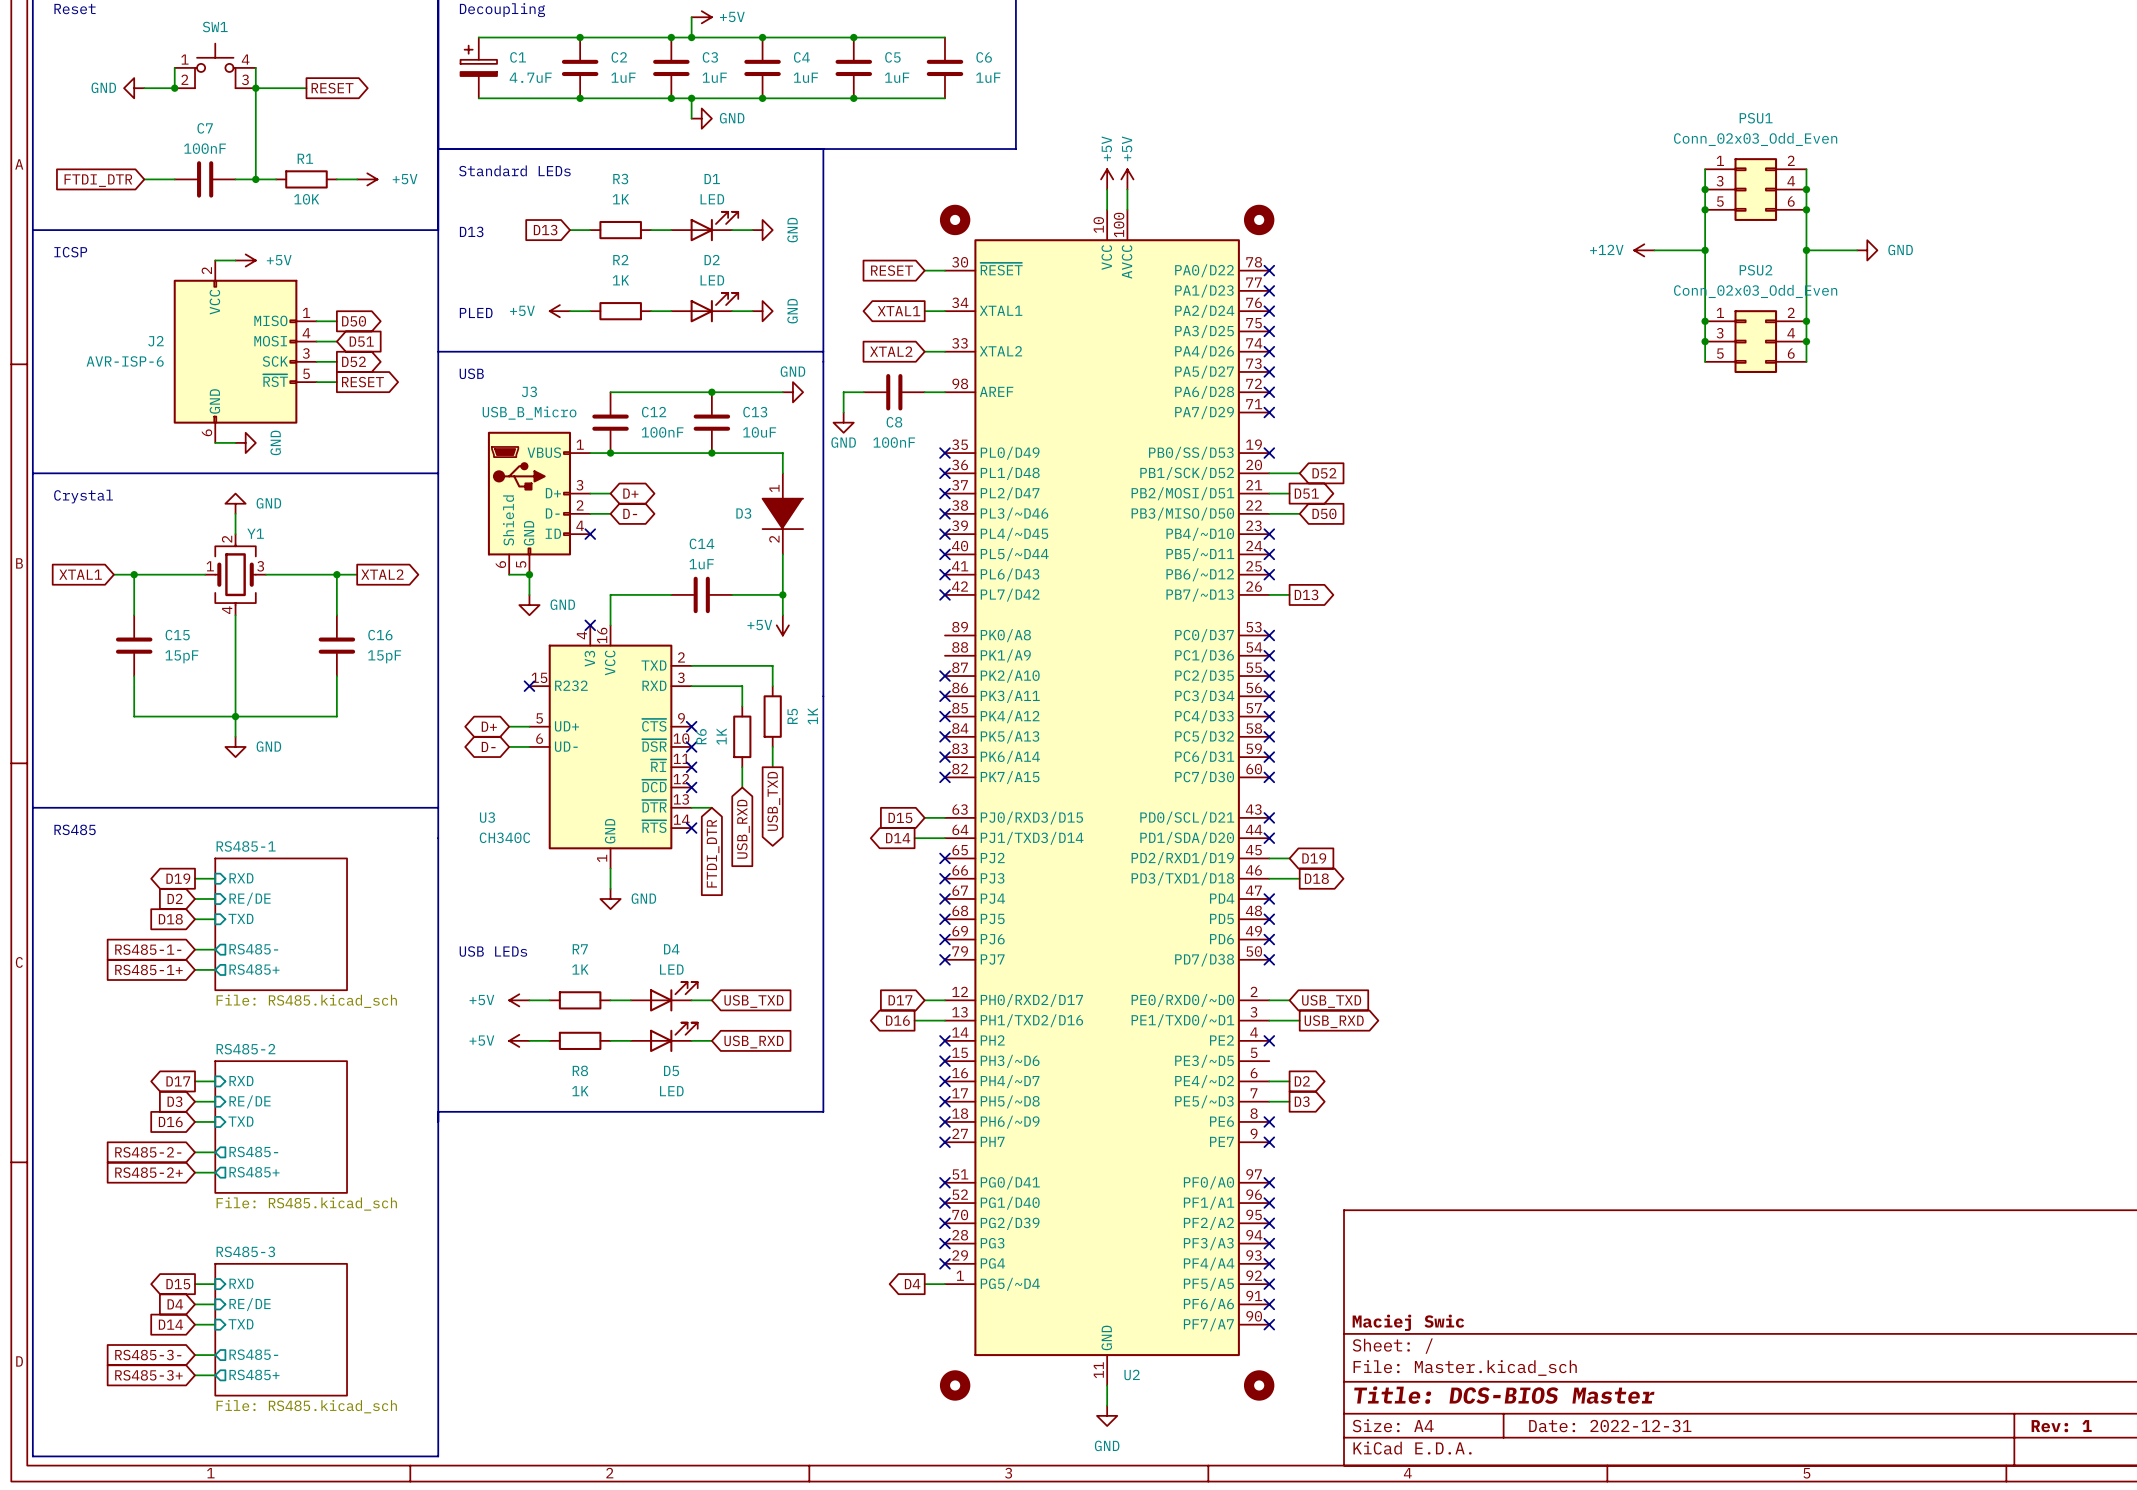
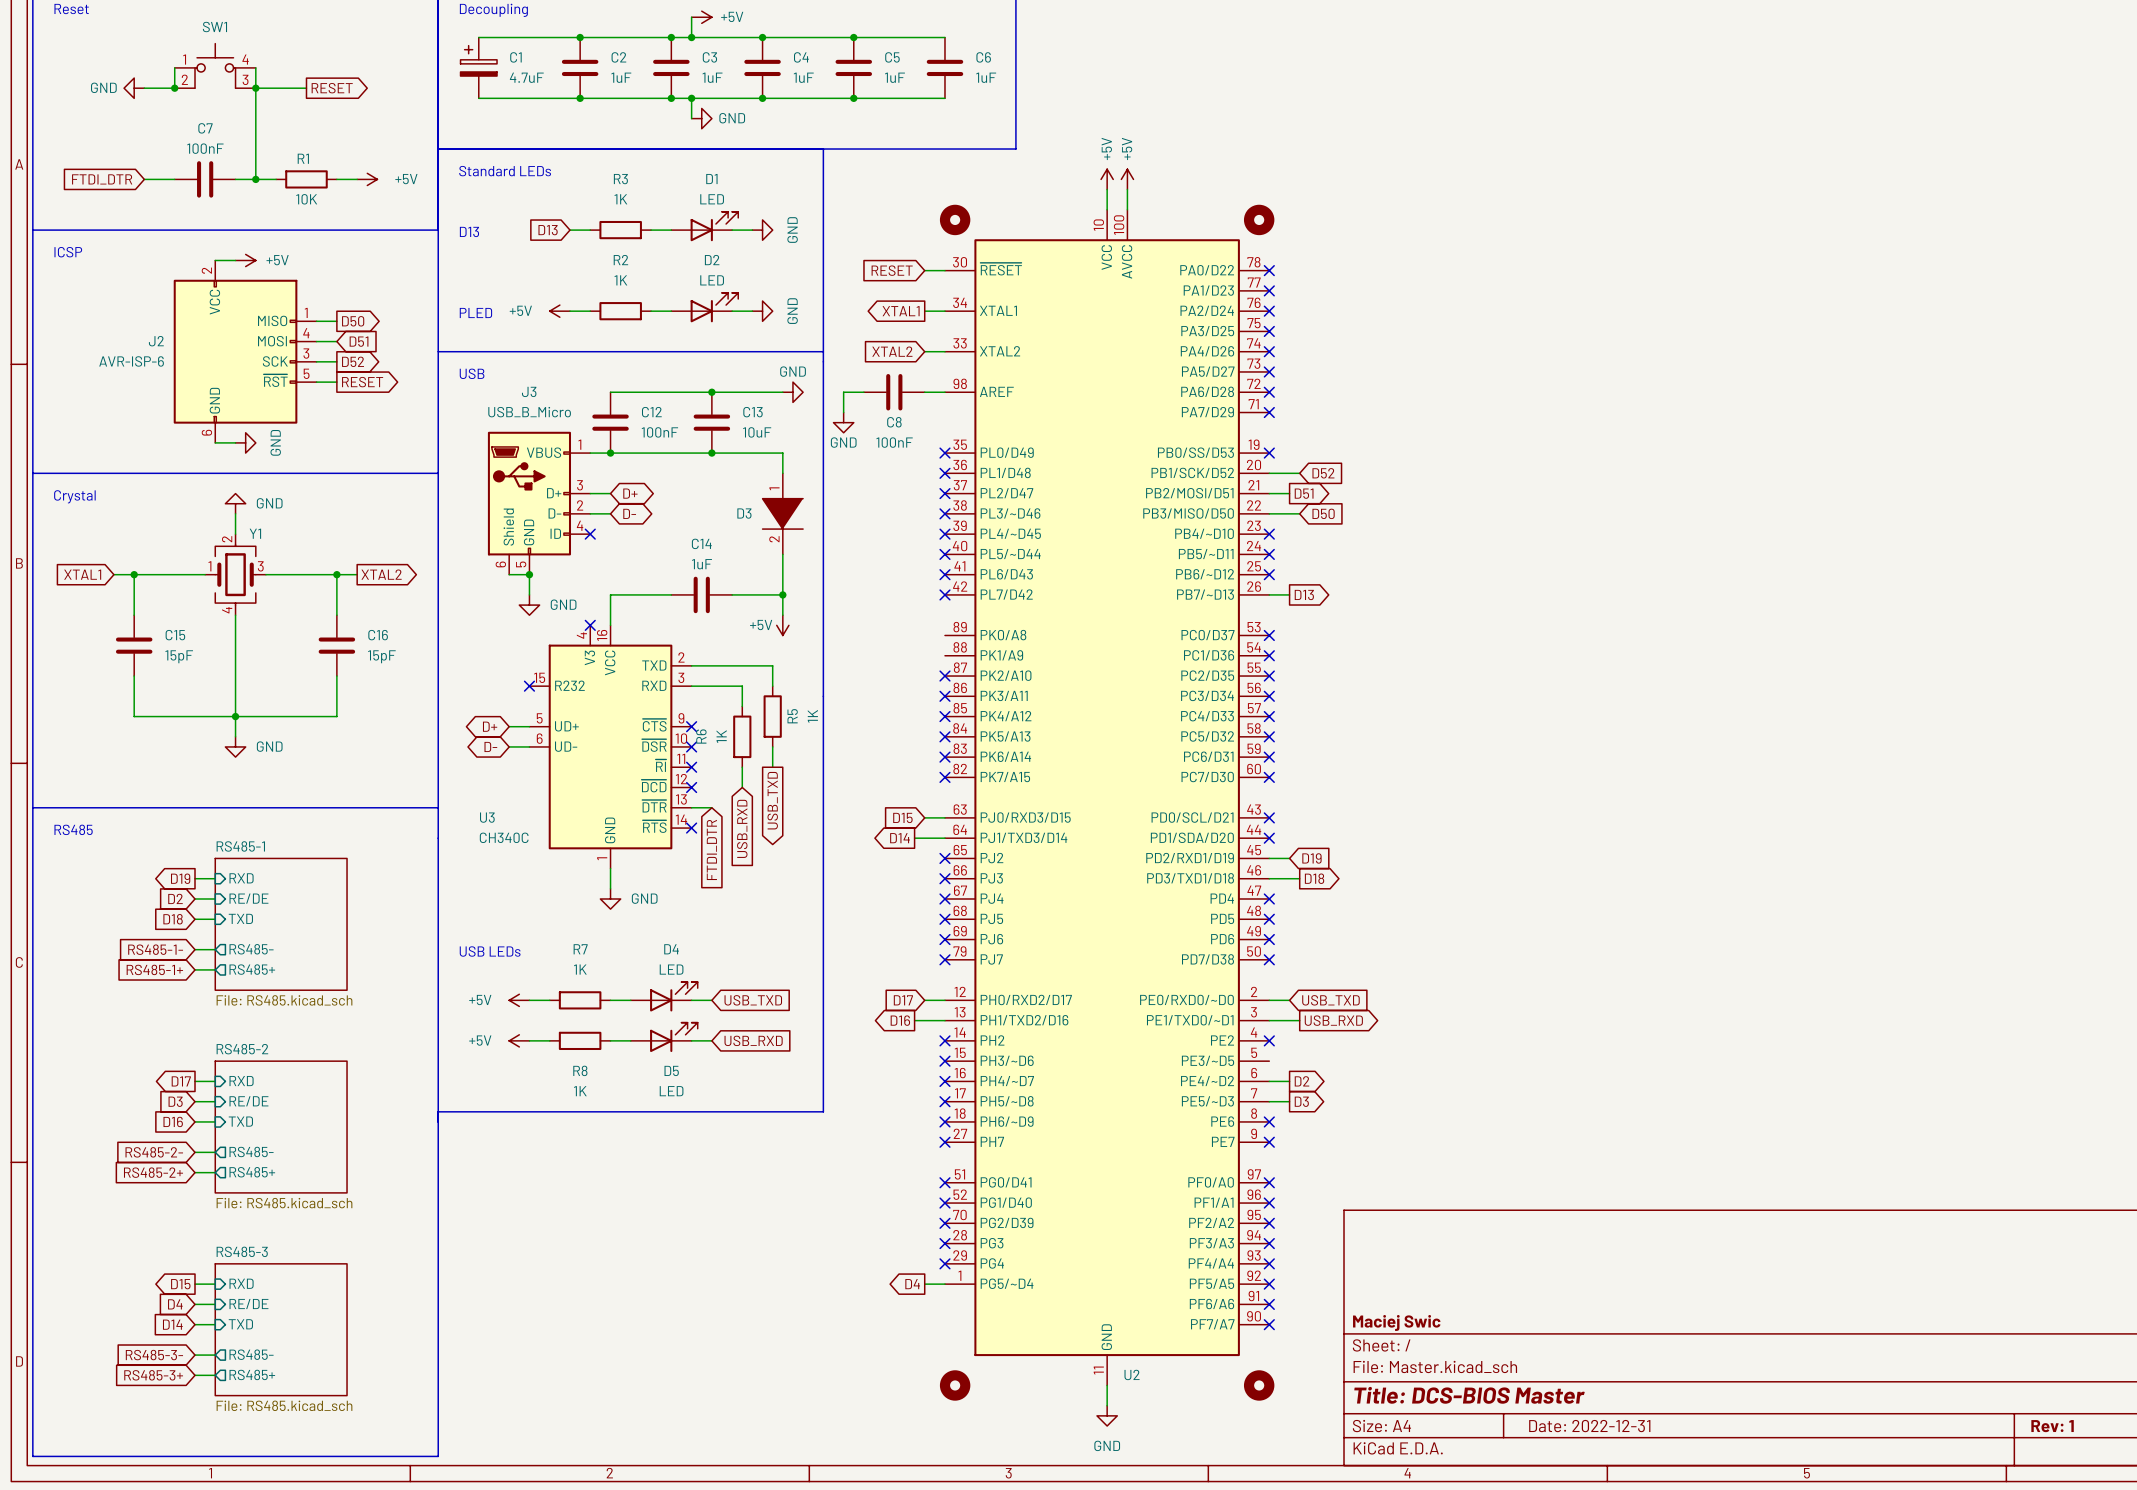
wire: (1705, 169) (1705, 361) -> none
wire: (1806, 169) (1806, 361) -> none
junction: (1705, 189) -> none
PSU1: Conn_02x03_Odd_Even (1755, 189) -> none
junction: (1806, 189) -> none
junction: (1705, 209) -> none
junction: (1806, 209) -> none
power symbol: +12V (1644, 250) -> none
wire: (1654, 250) (1705, 250) -> none
junction: (1705, 250) -> none
wire: (1806, 250) (1857, 250) -> none
junction: (1806, 250) -> none
power symbol: GND (1867, 250) -> none
junction: (1705, 321) -> none
junction: (1806, 321) -> none
junction: (1705, 341) -> none
PSU2: Conn_02x03_Odd_Even (1755, 341) -> none
junction: (1806, 341) -> none

